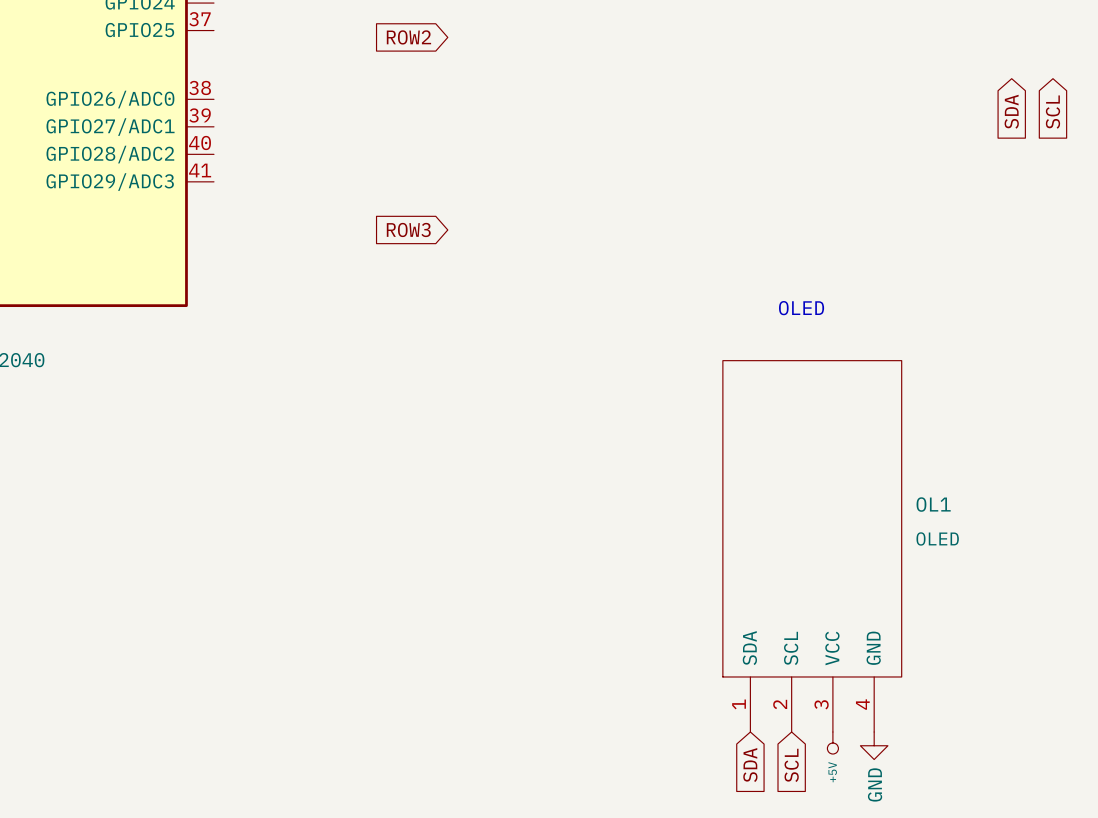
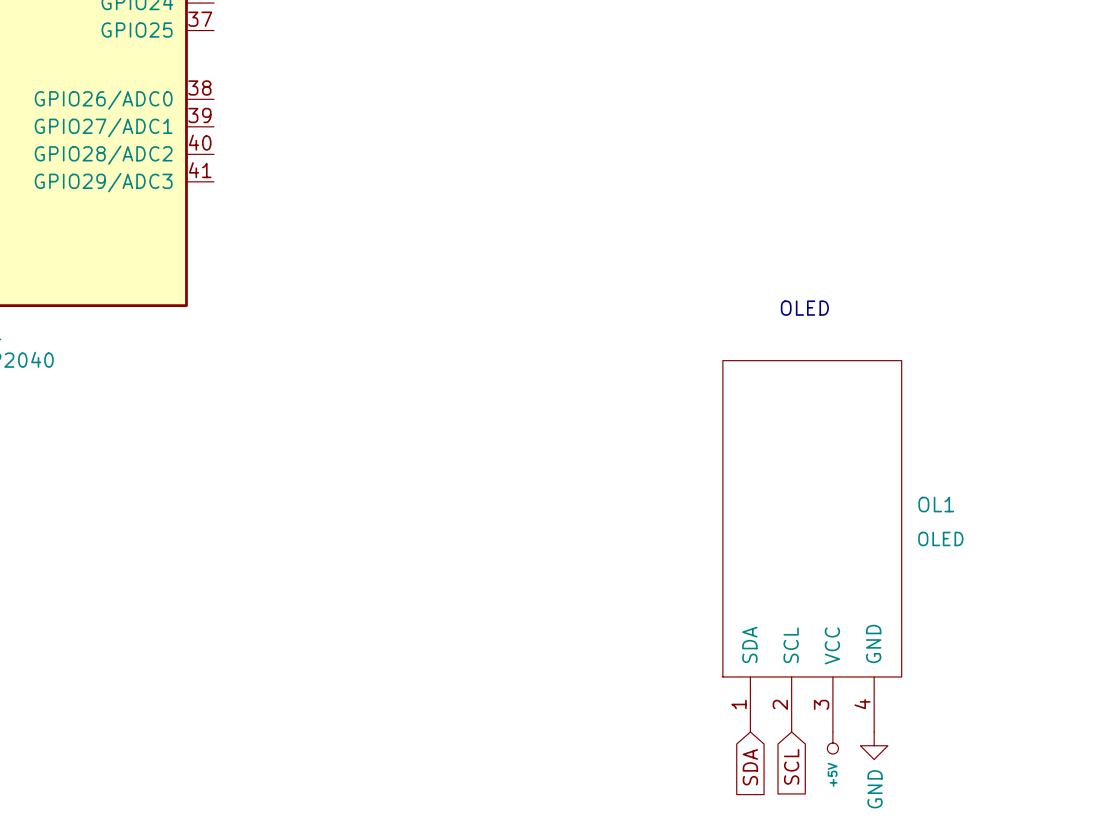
global label: ROW2 (408, 37) -> none
global label: SDA (1011, 111) -> none
global label: SCL (1052, 112) -> none
global label: ROW3 (408, 229) -> none

